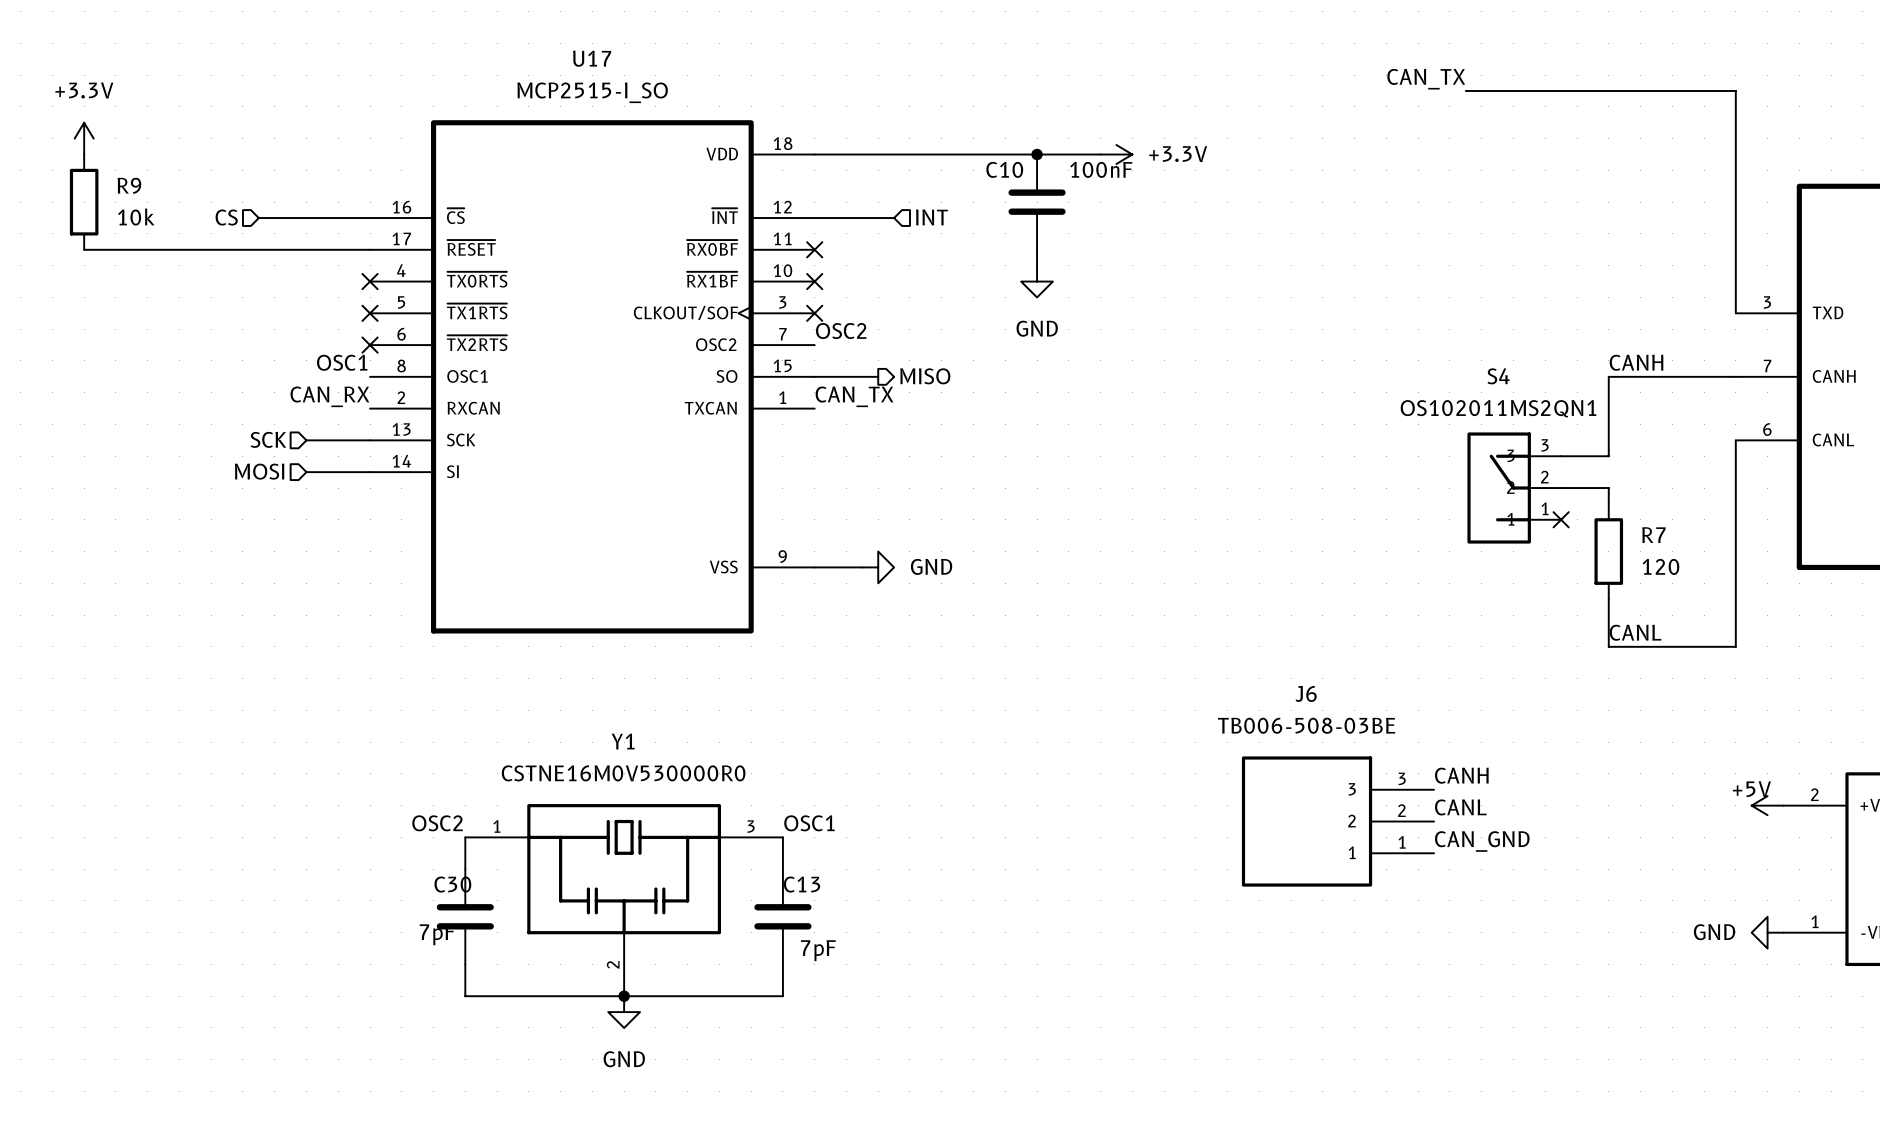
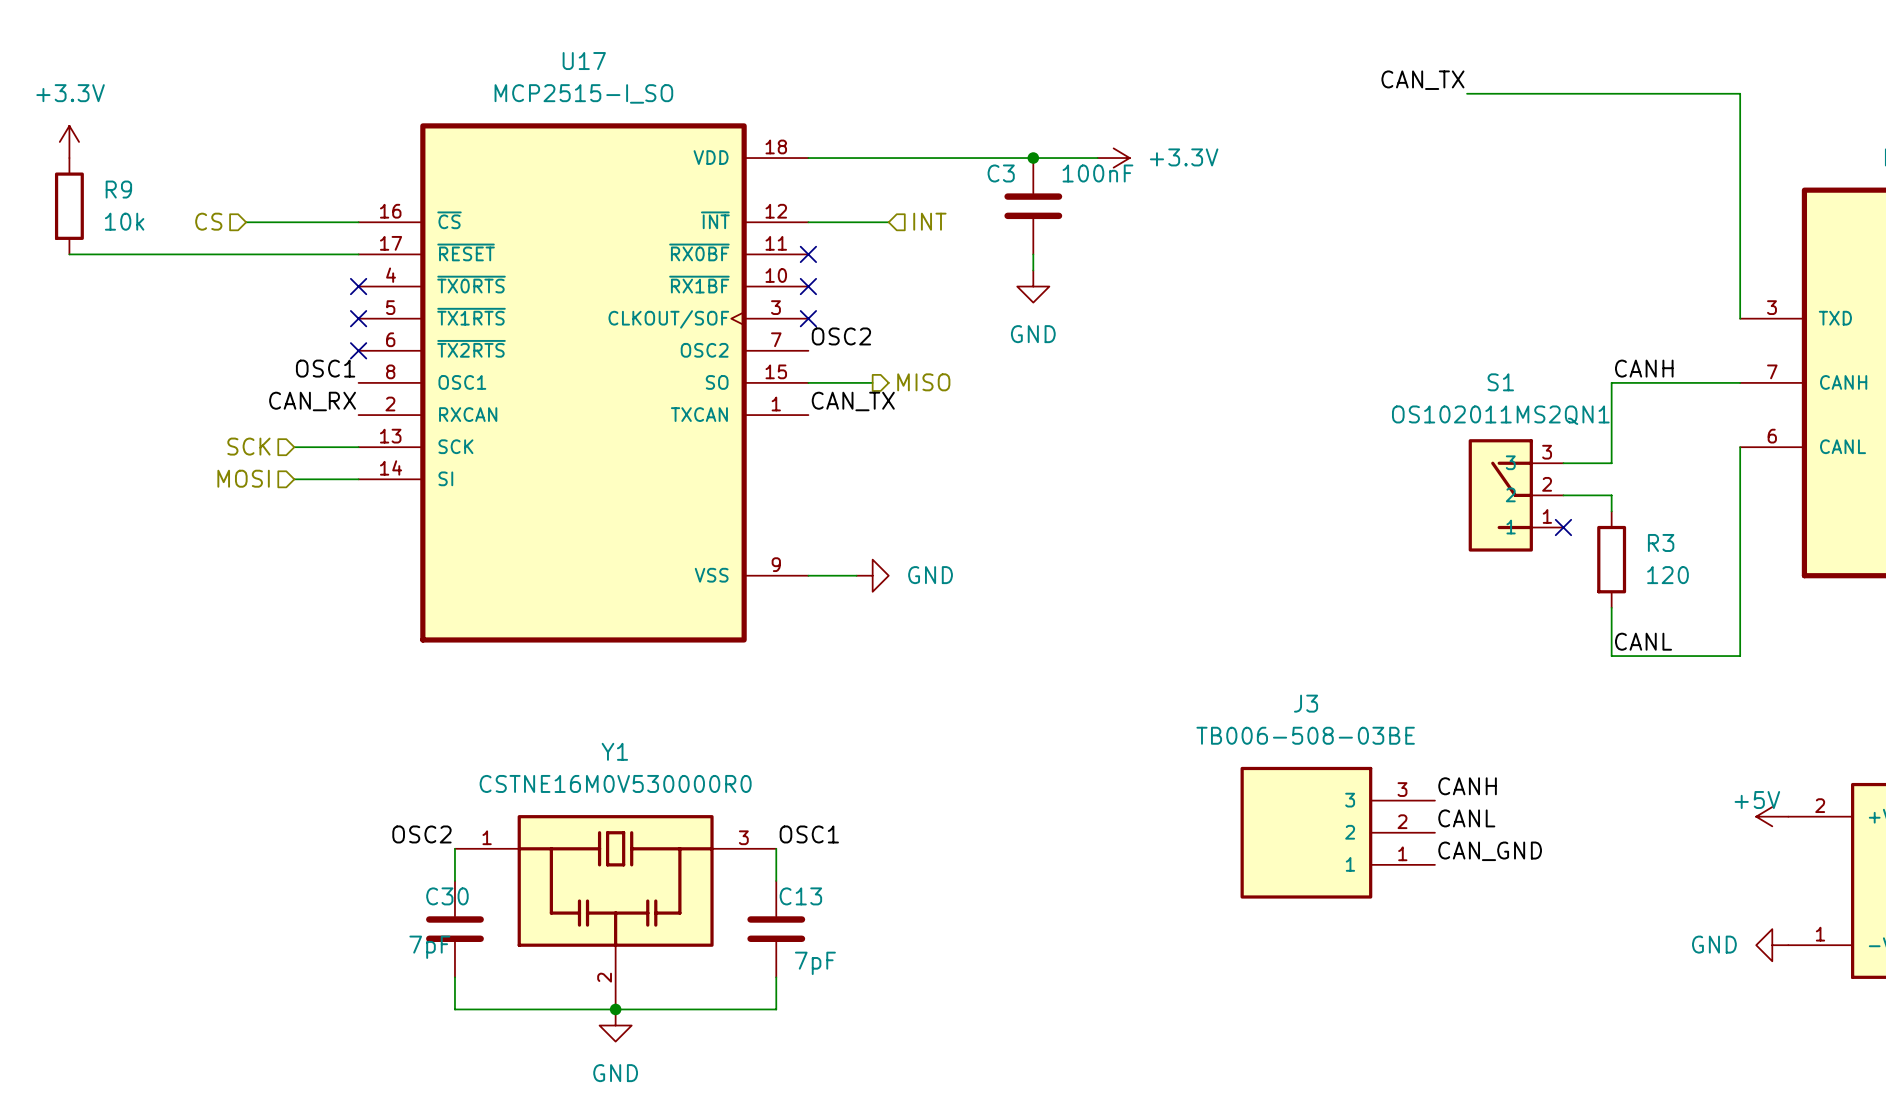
C10 name: C10 (1004, 169) -> C3 (1001, 173)
S4 name: S4 (1498, 376) -> S1 (1500, 382)
R7 name: R7 (1653, 535) -> R3 (1661, 542)
J6 name: J6 (1306, 693) -> J3 (1306, 703)

